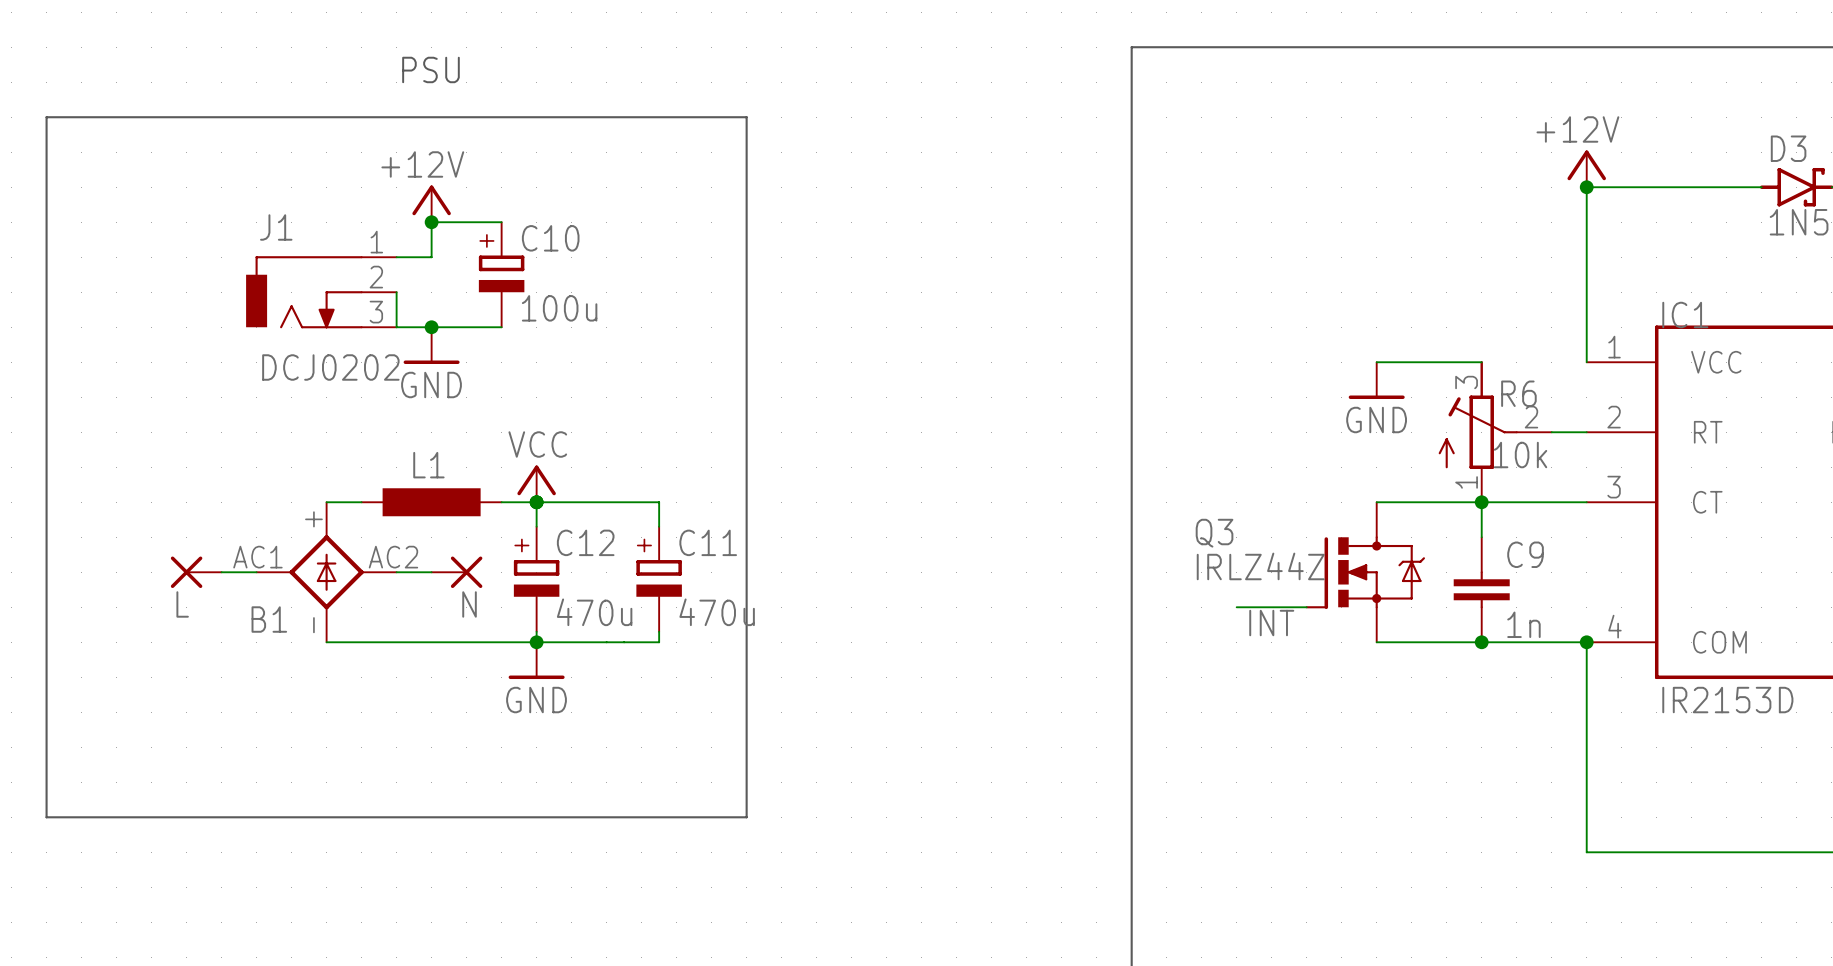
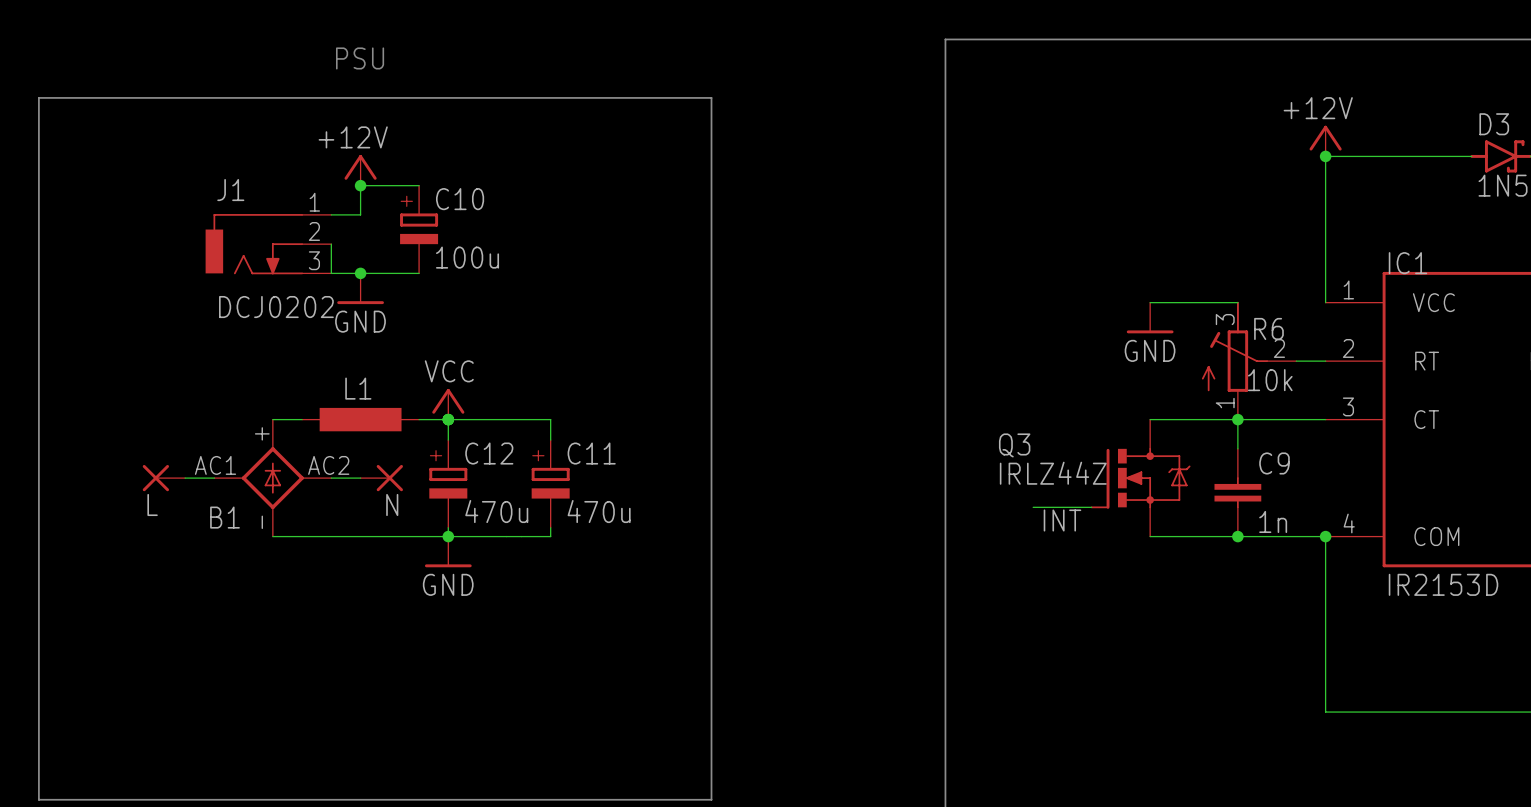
line: (746, 117) (746, 817) (46, 817) -> (623, 97) (711, 97) (711, 799) (38, 799) (38, 682)

